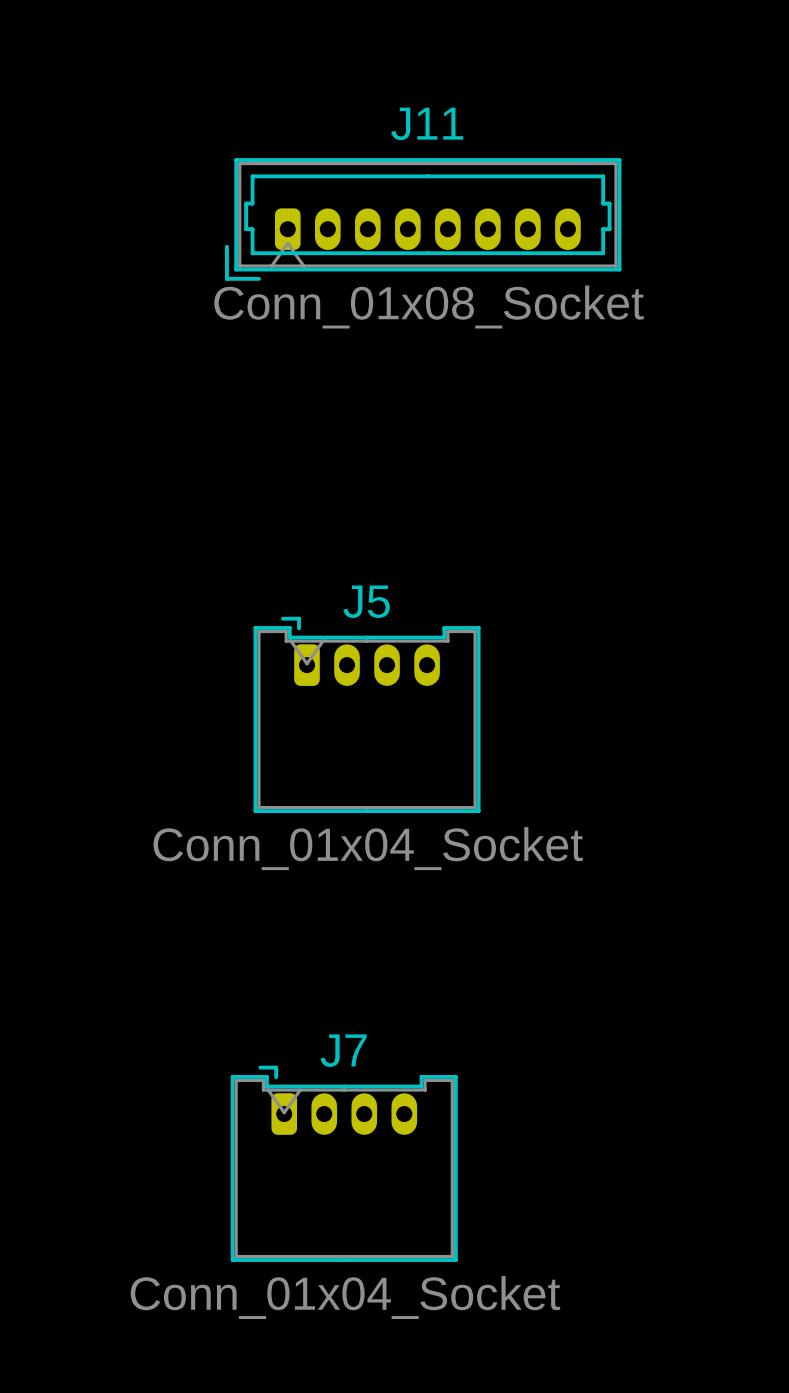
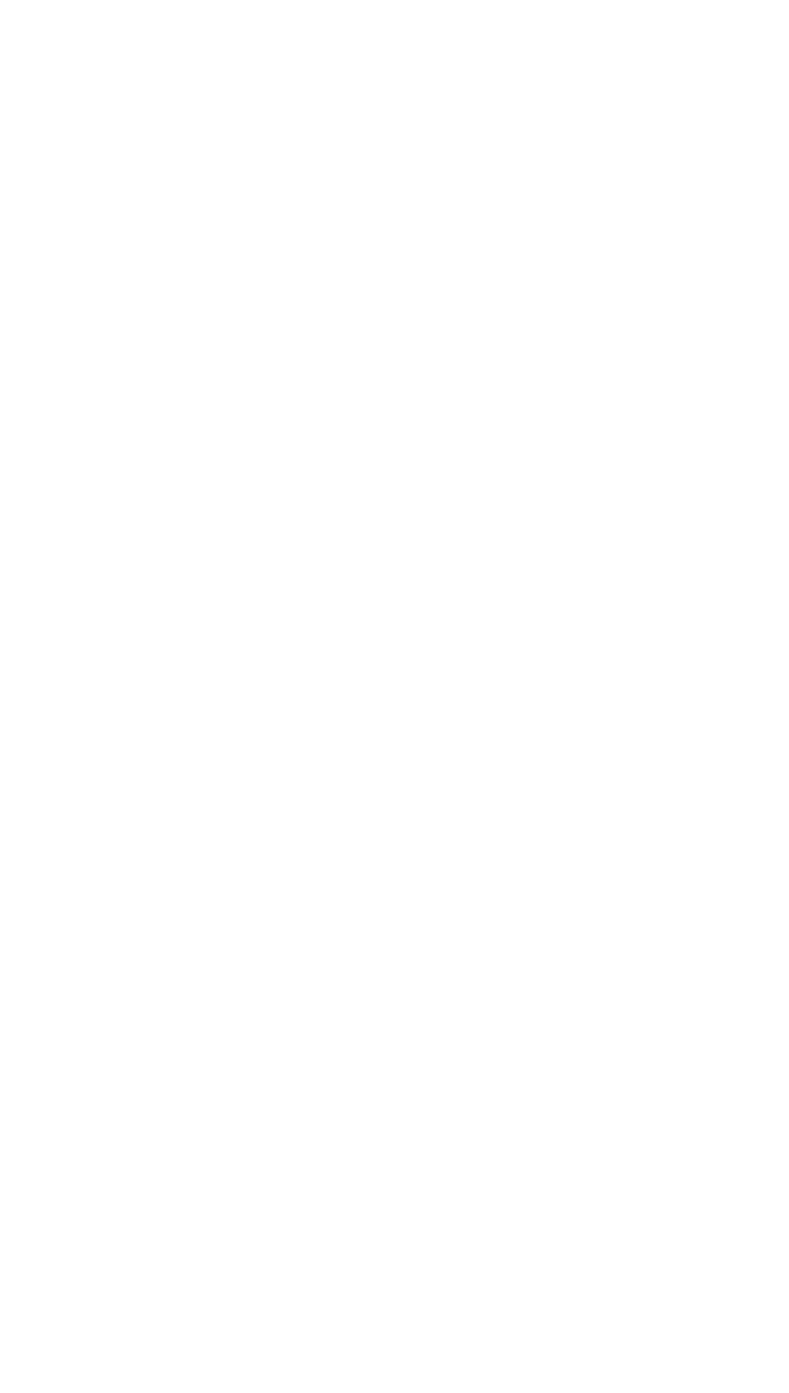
J11: Conn_01x08_Socket (423, 219) -> none
J5: Conn_01x04_Socket (367, 714) -> none
J7: Conn_01x04_Socket (344, 1163) -> none

